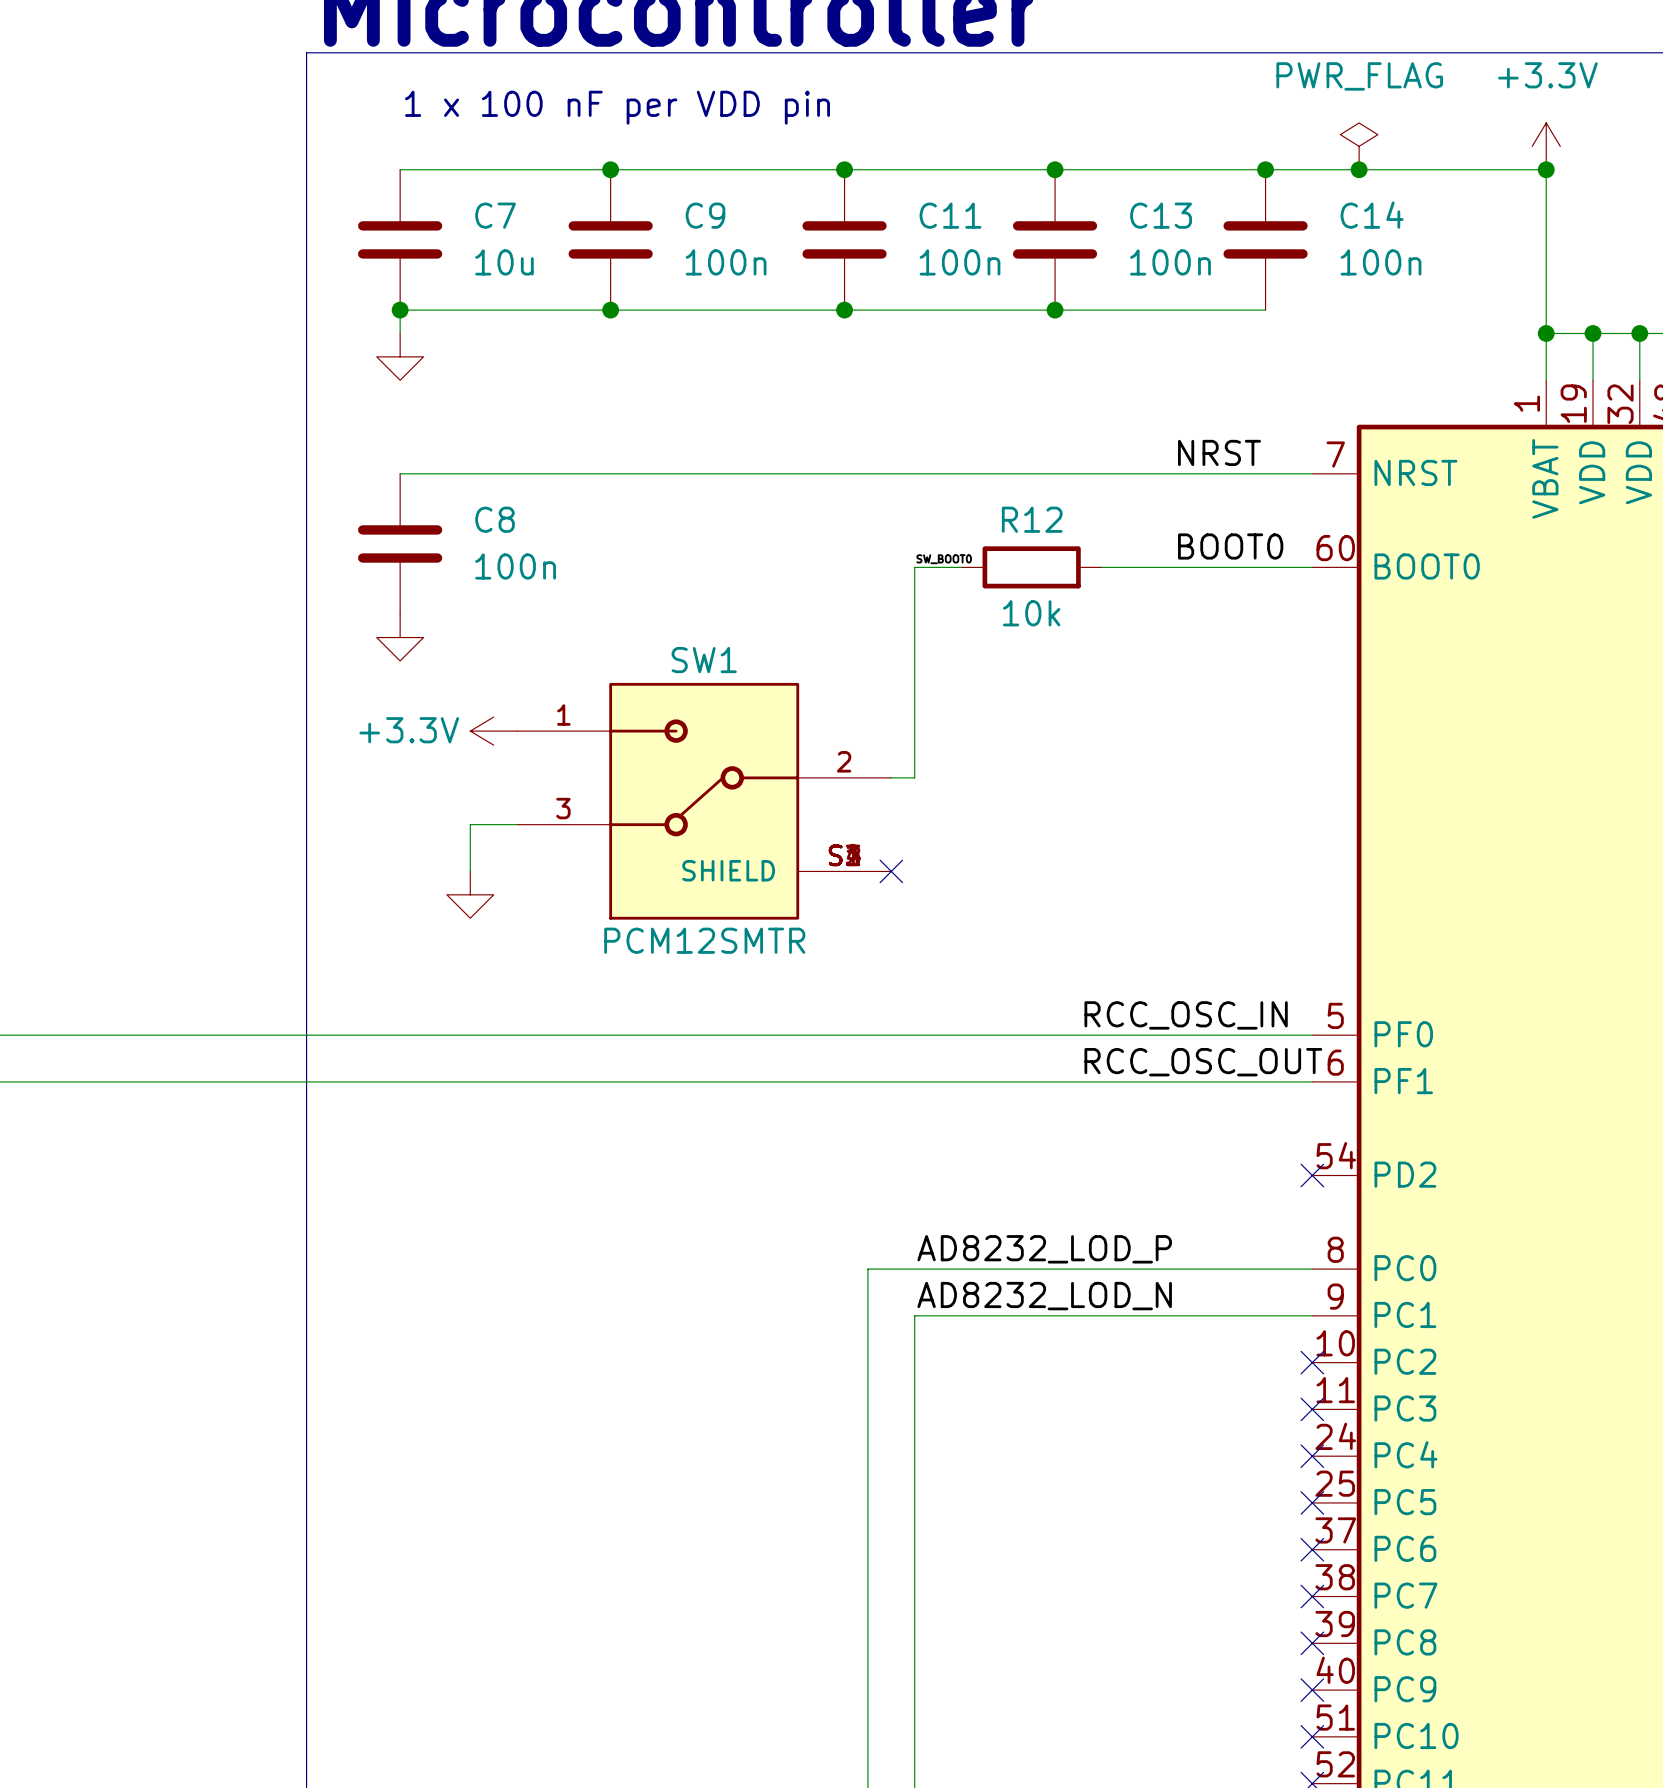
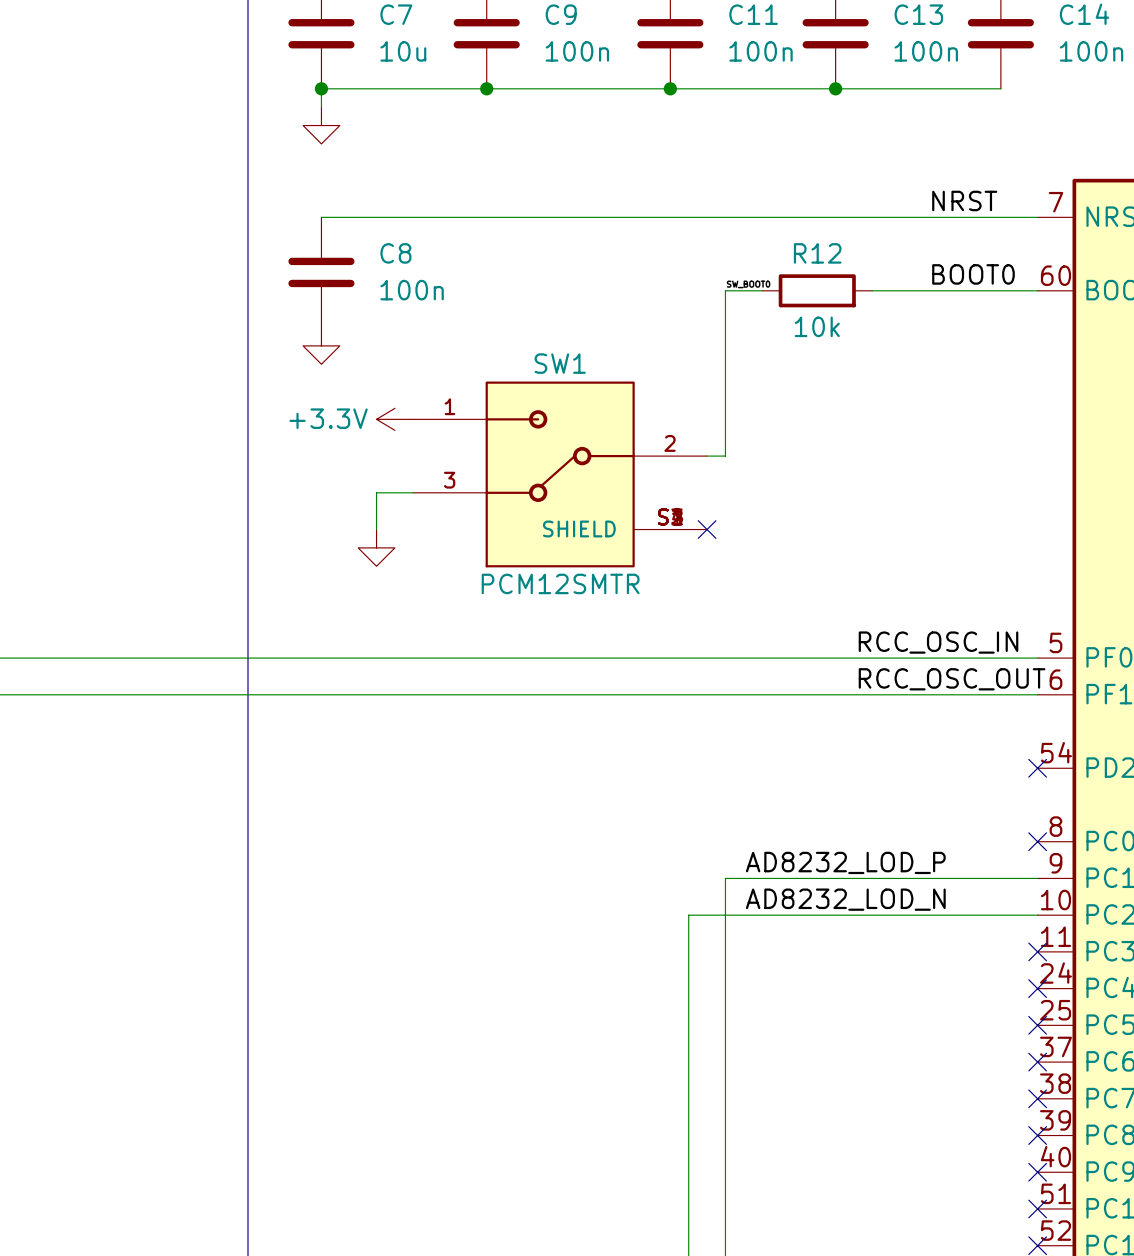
label position: AD8232_LOD_P (1044, 1249) -> AD8232_LOD_P (845, 862)
wire: (1312, 1269) (867, 1269) (867, 1362) -> (1037, 915) (688, 915)
label position: AD8232_LOD_N (1044, 1296) -> AD8232_LOD_N (845, 899)
no-connect mark position: (1312, 1362) -> (1037, 841)

